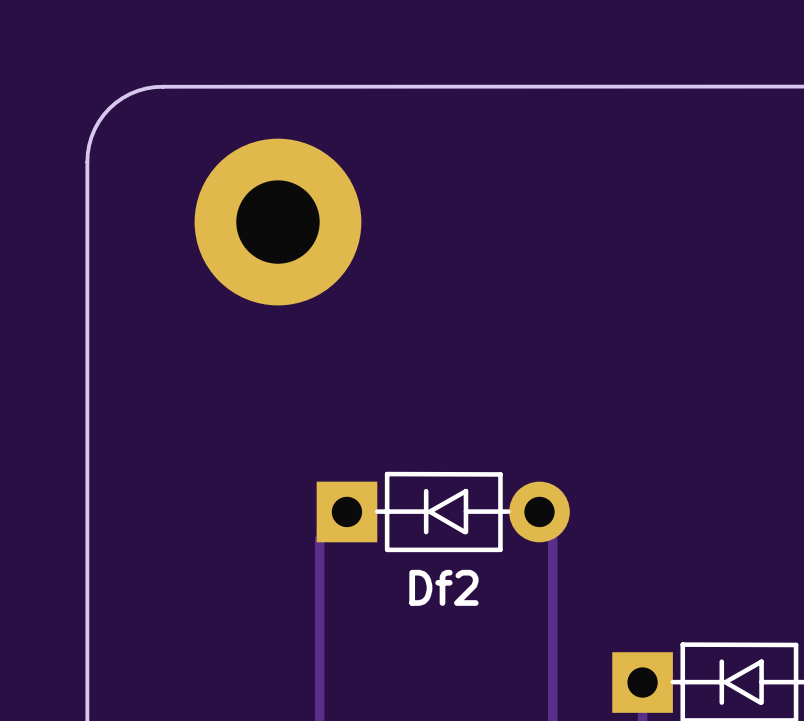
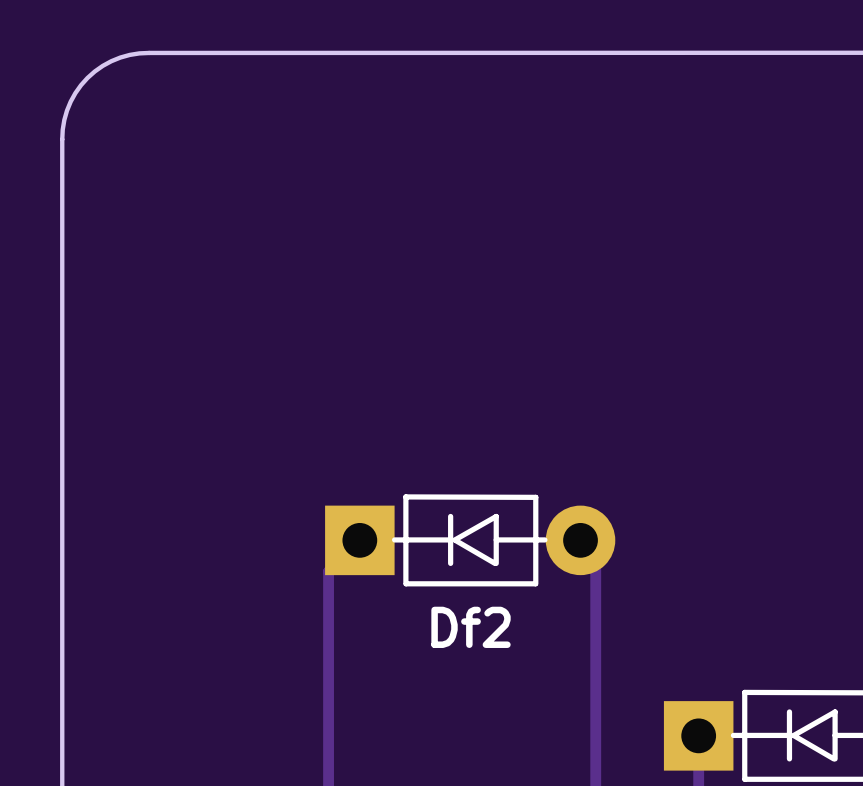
part: (277, 222) -> none

